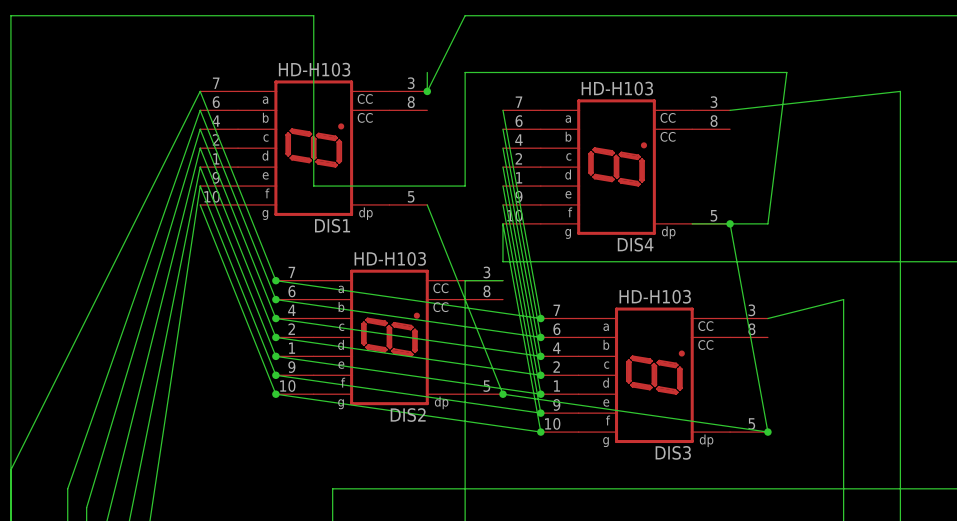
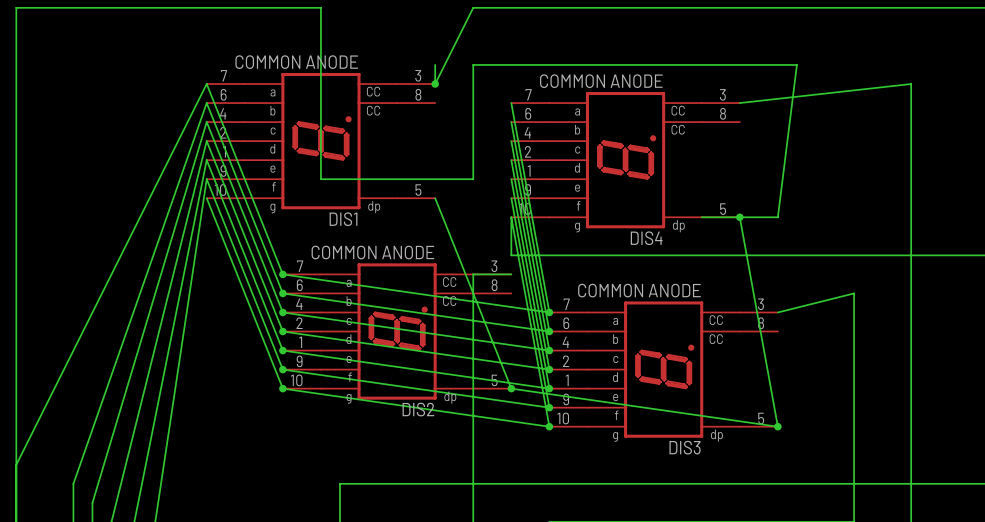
DIS1 value: HD-H103 (314, 69) -> COMMON ANODE (296, 62)
DIS4 value: HD-H103 (617, 88) -> COMMON ANODE (601, 81)
DIS2 value: HD-H103 (390, 258) -> COMMON ANODE (372, 252)
DIS3 value: HD-H103 (655, 296) -> COMMON ANODE (639, 290)

